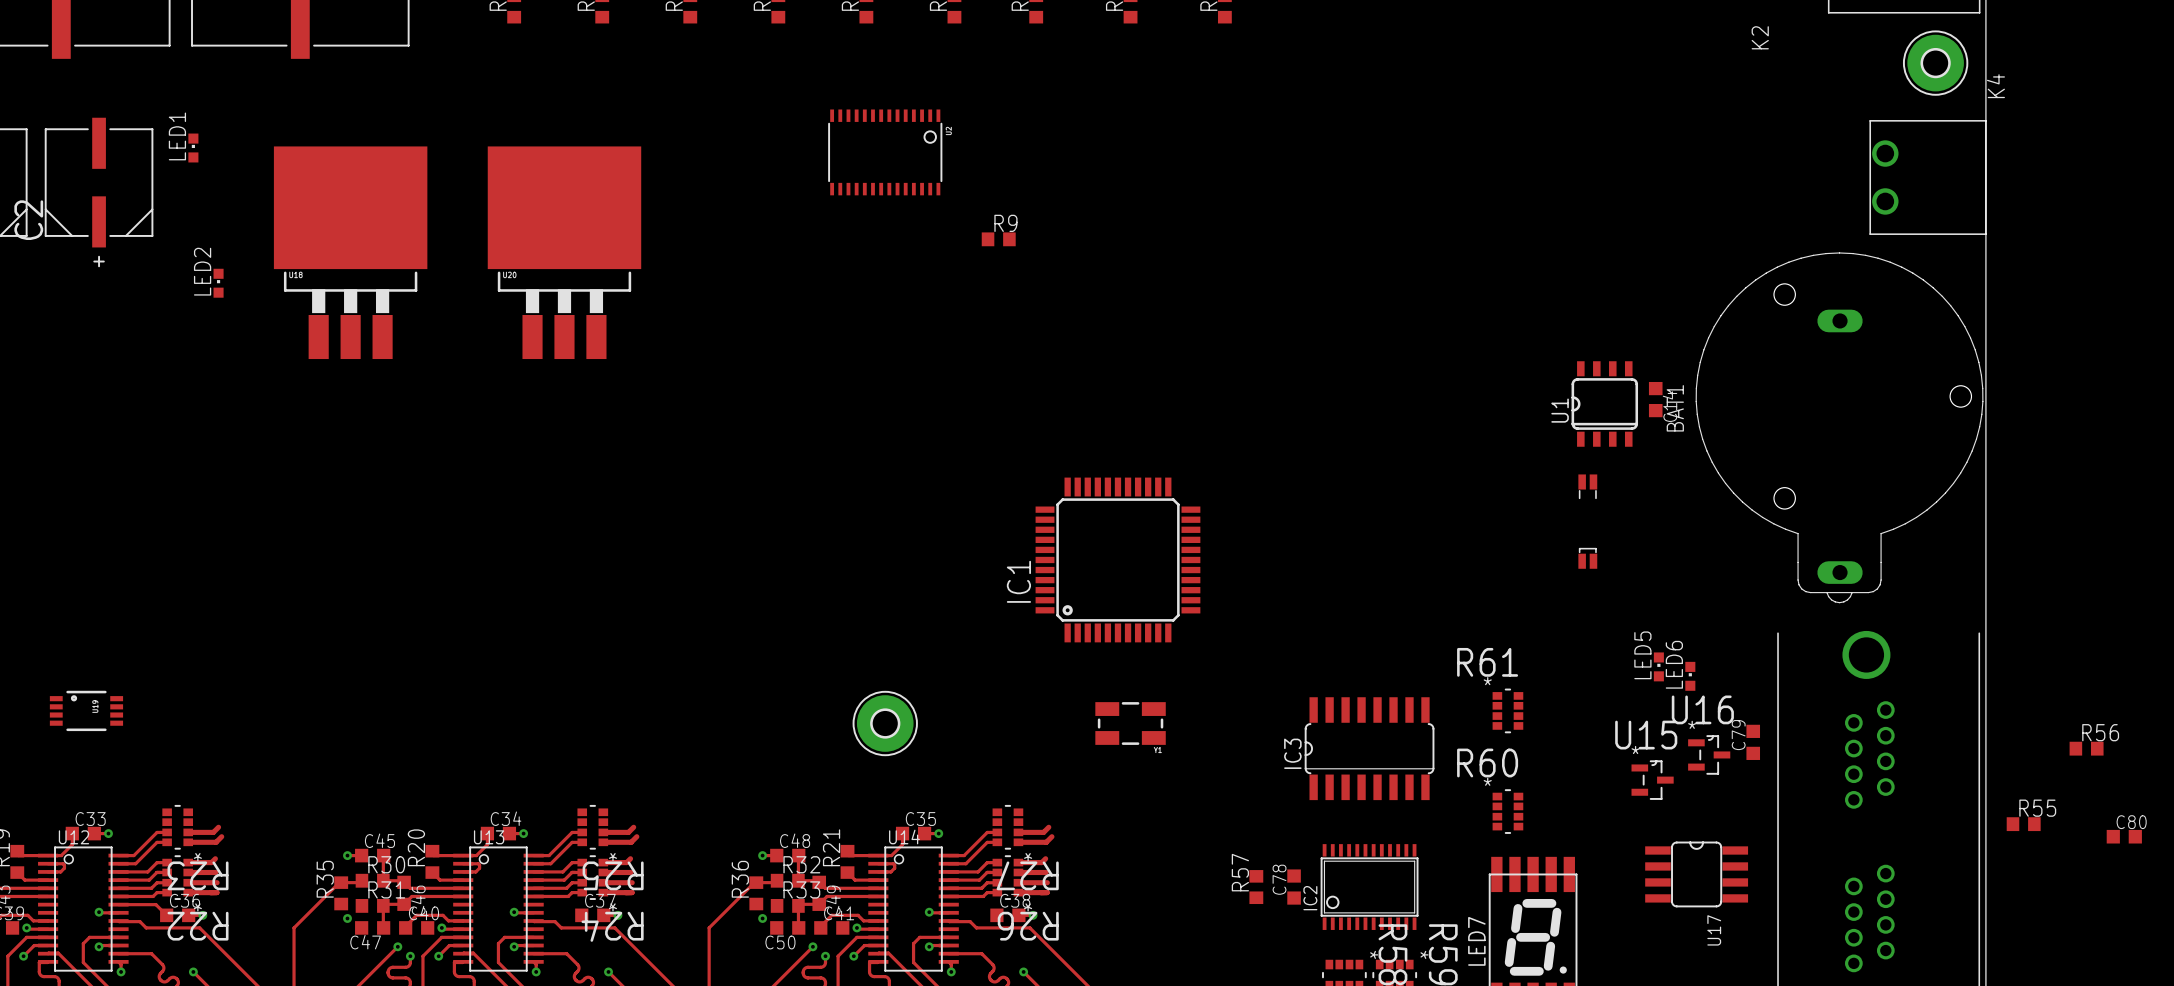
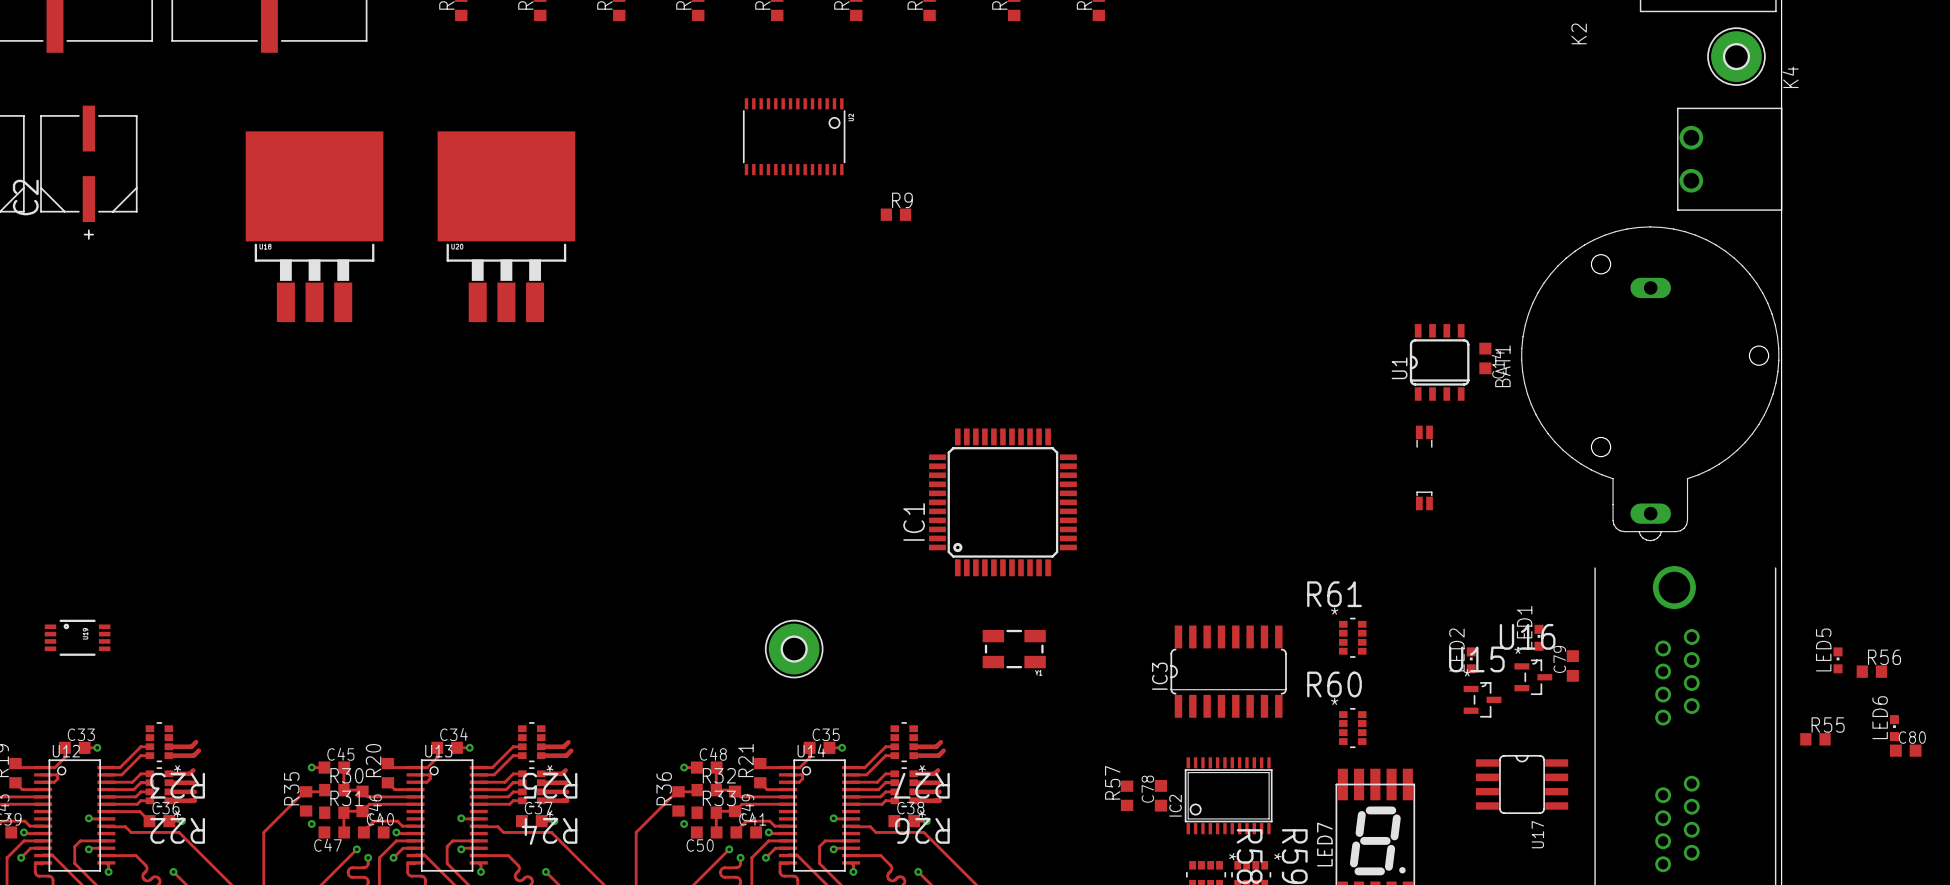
LED1 position: (193, 148) -> (1538, 637)
LED2 position: (218, 283) -> (1471, 660)
LED5 position: (1658, 666) -> (1838, 660)
LED6 position: (1690, 676) -> (1894, 728)

